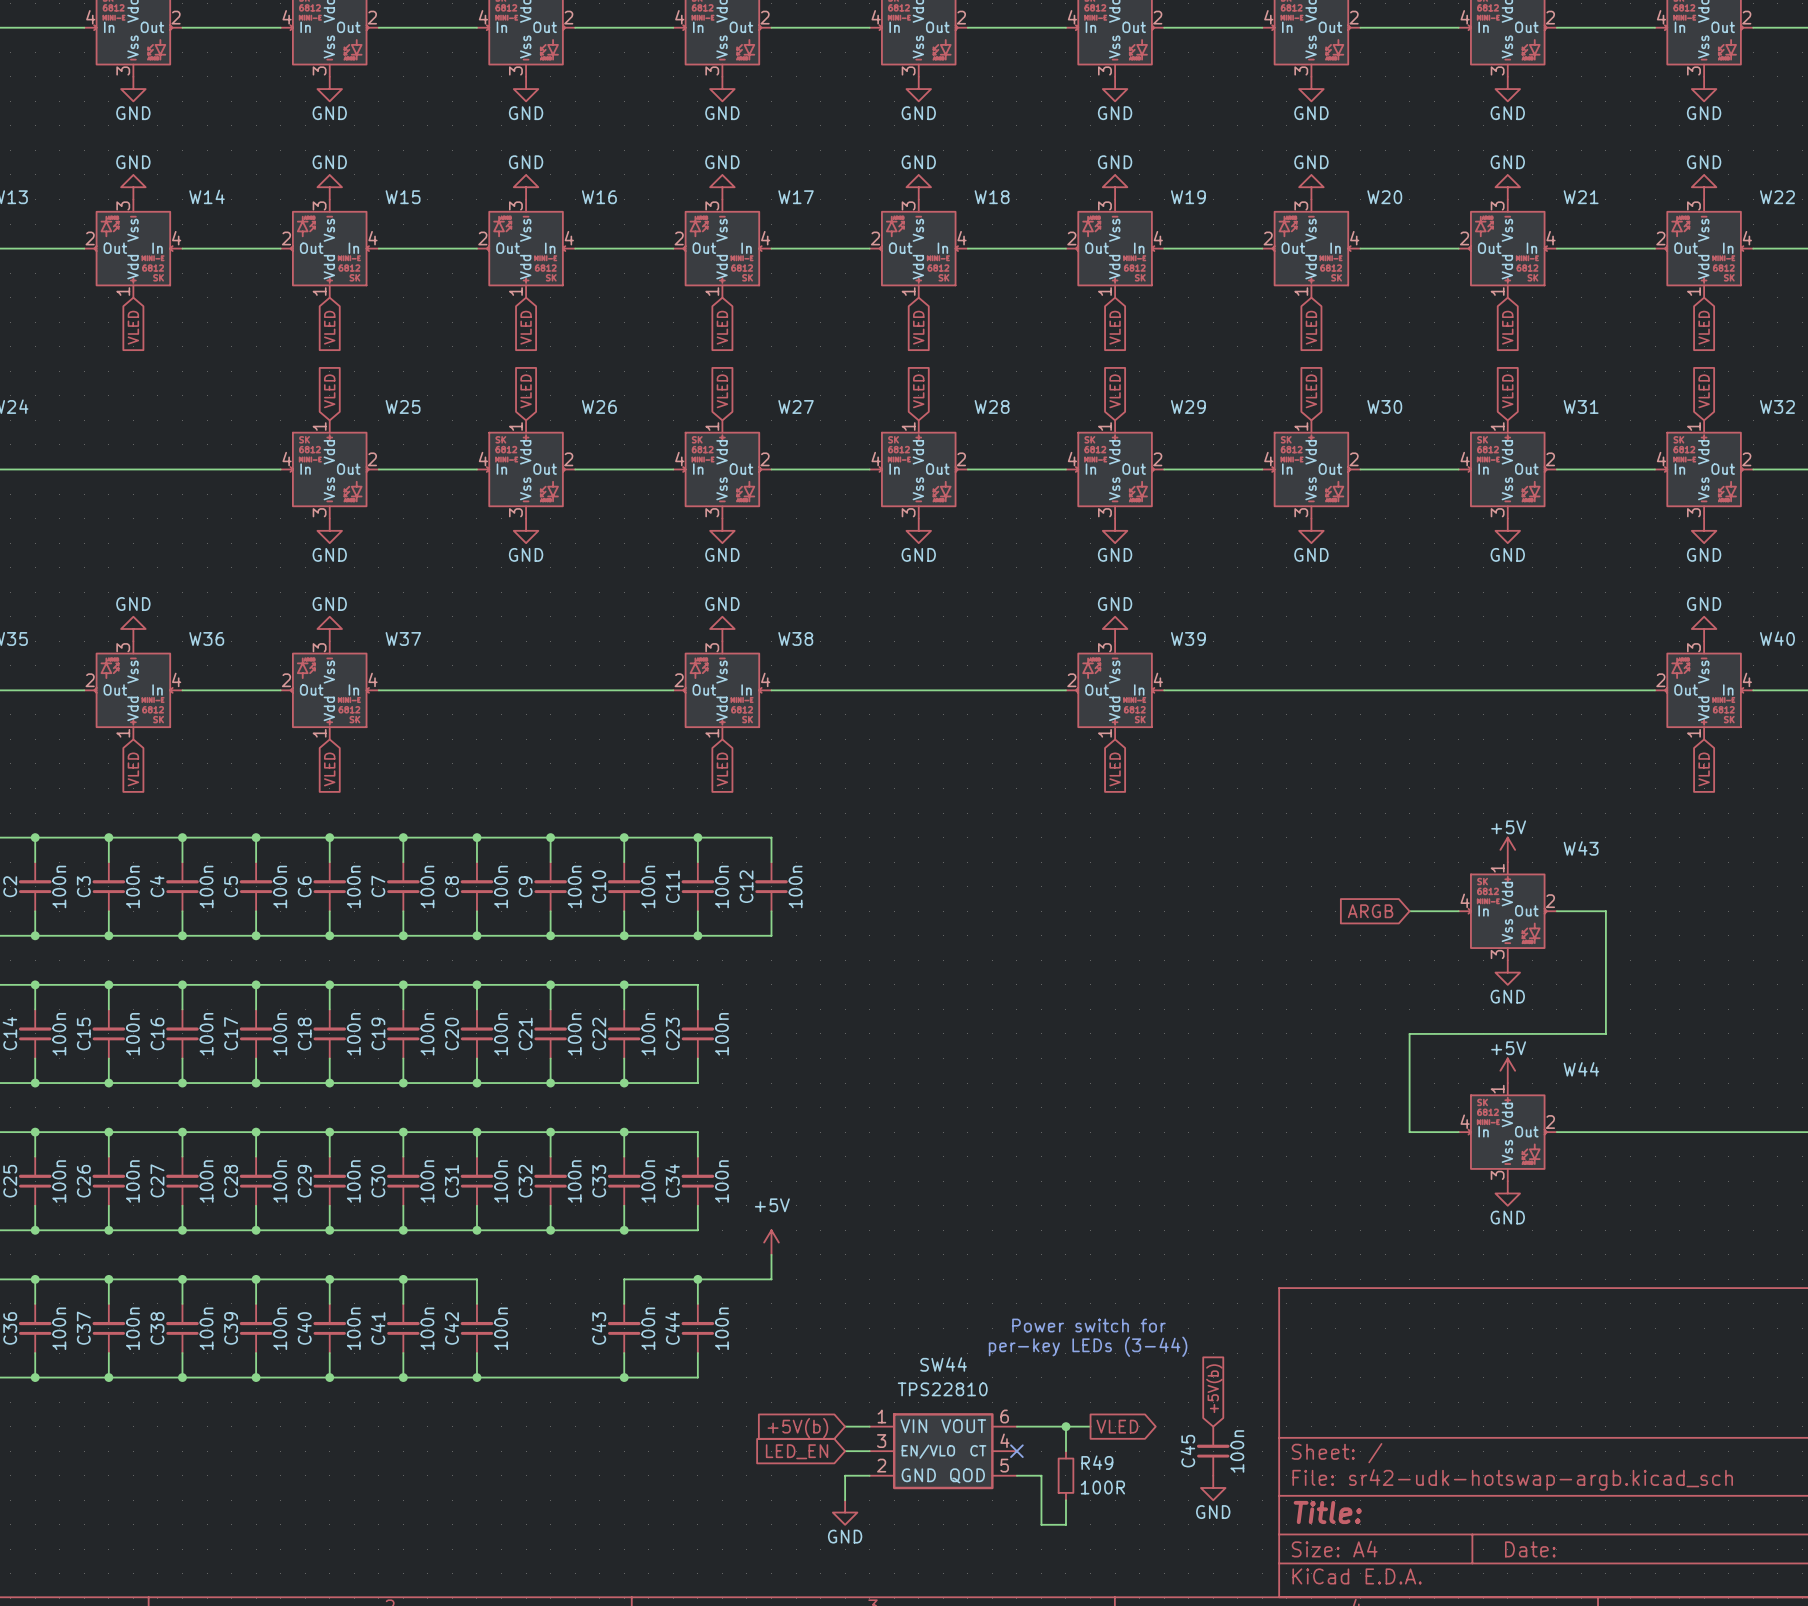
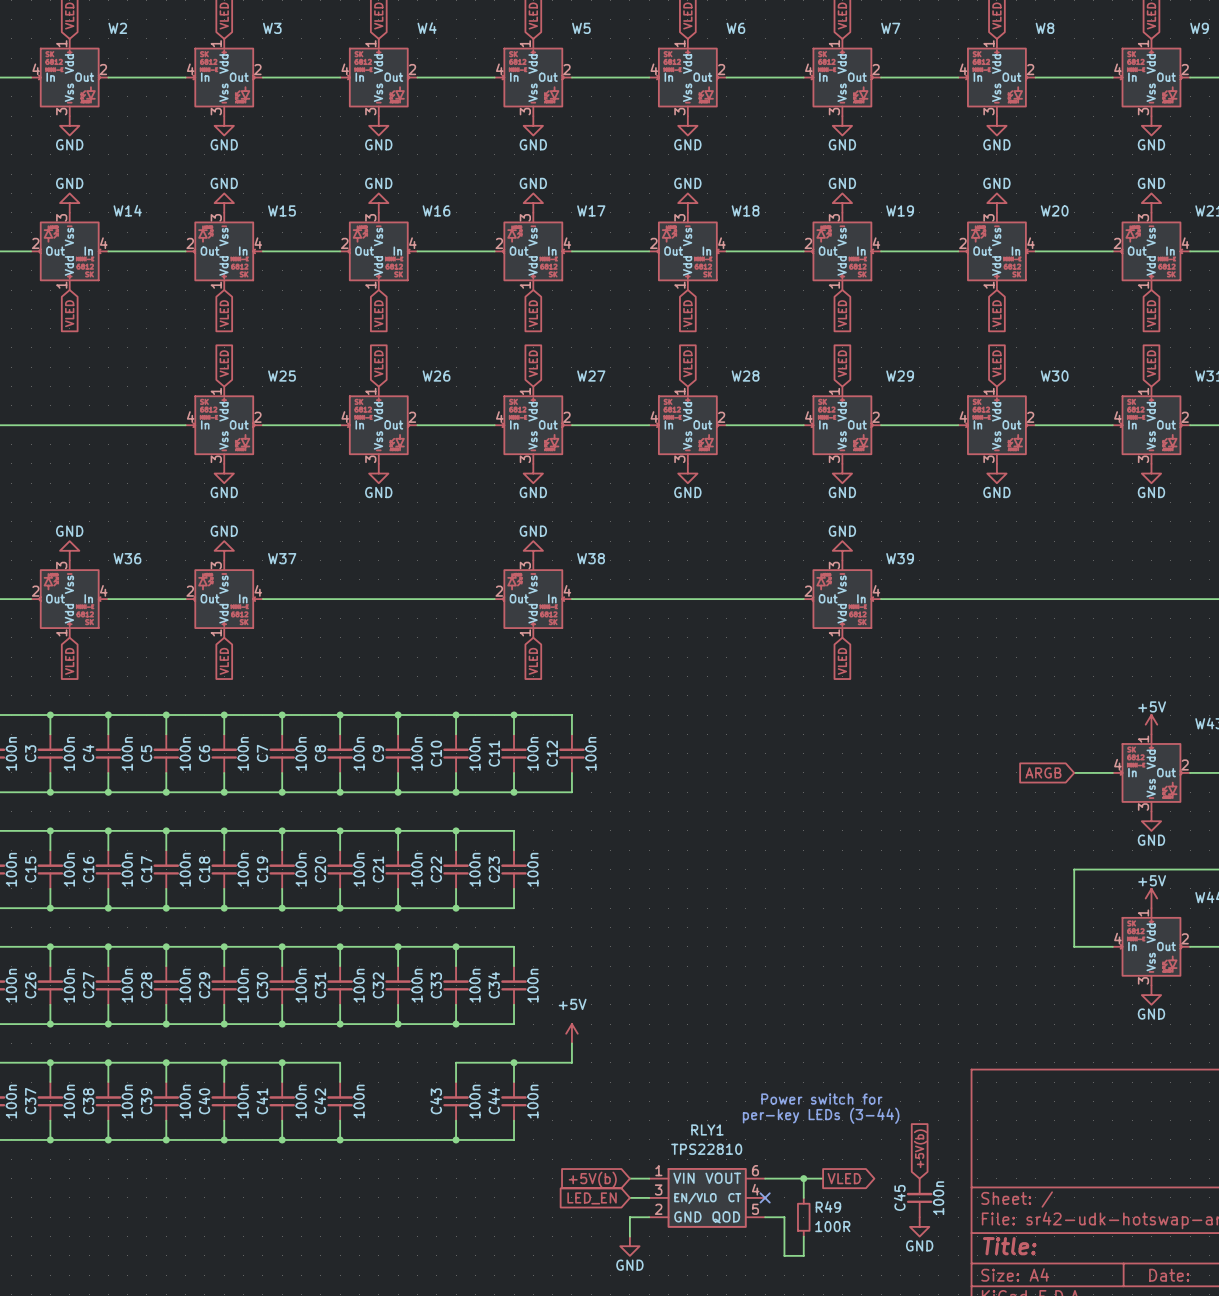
SW44 name: SW44 (943, 1364) -> RLY1 (707, 1129)

